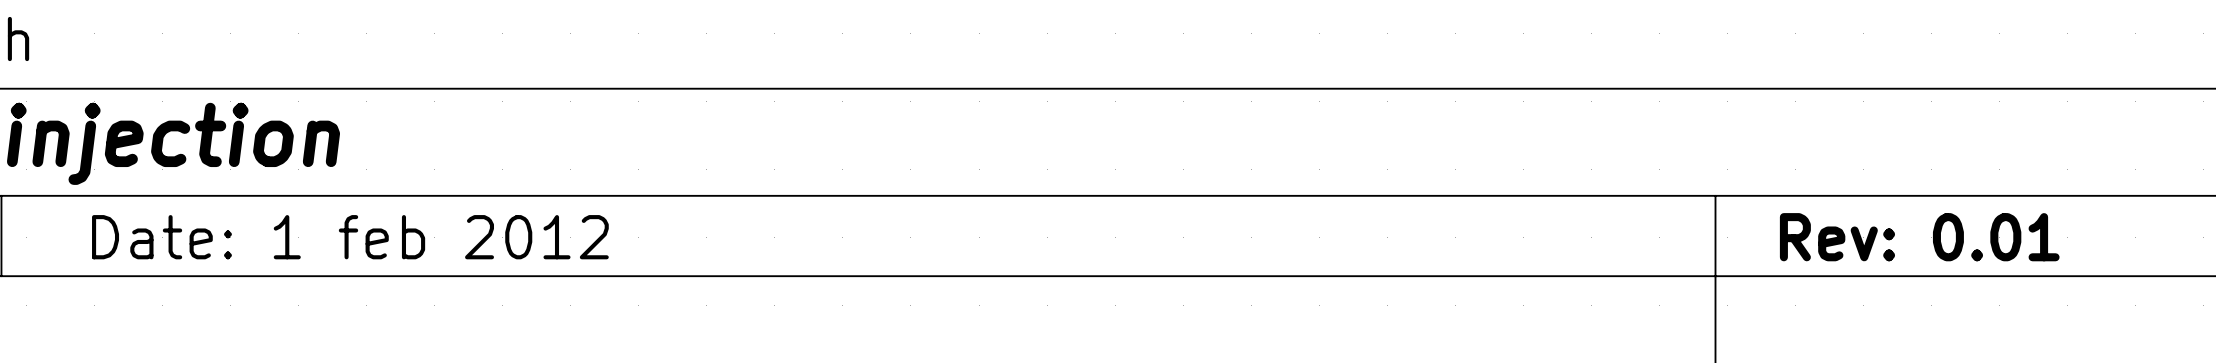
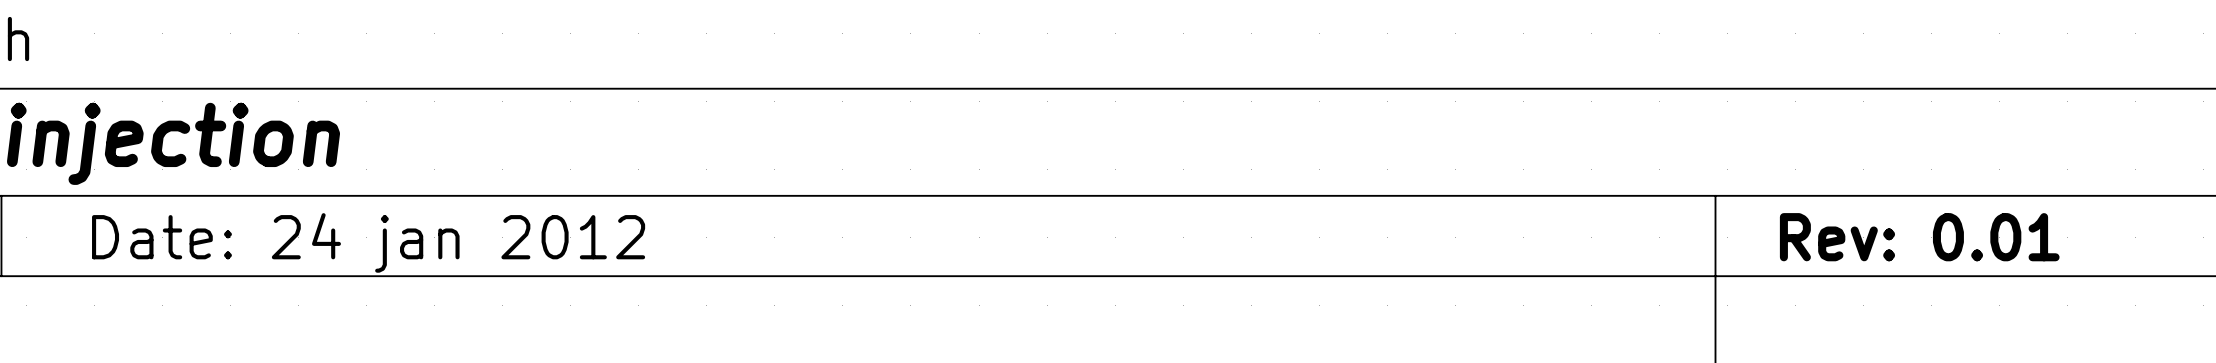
title block: Date: 1 feb 2012 (350, 237) -> Date: 24 jan 2012 (368, 242)

